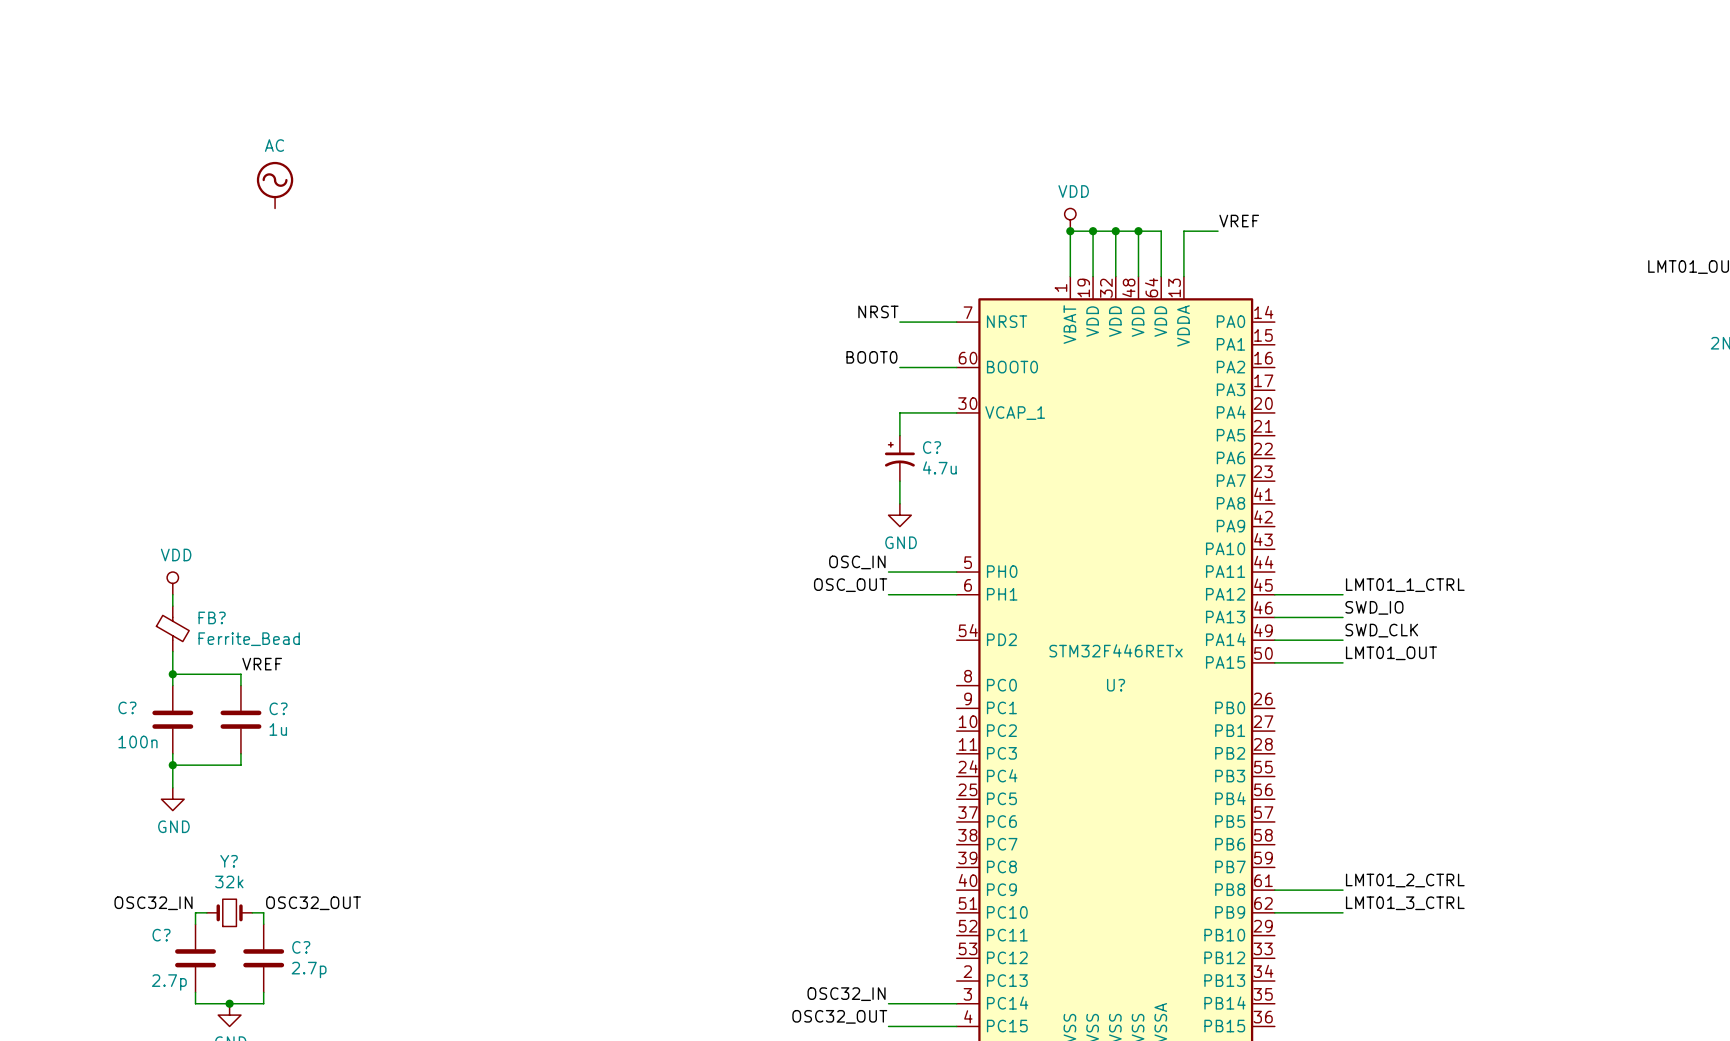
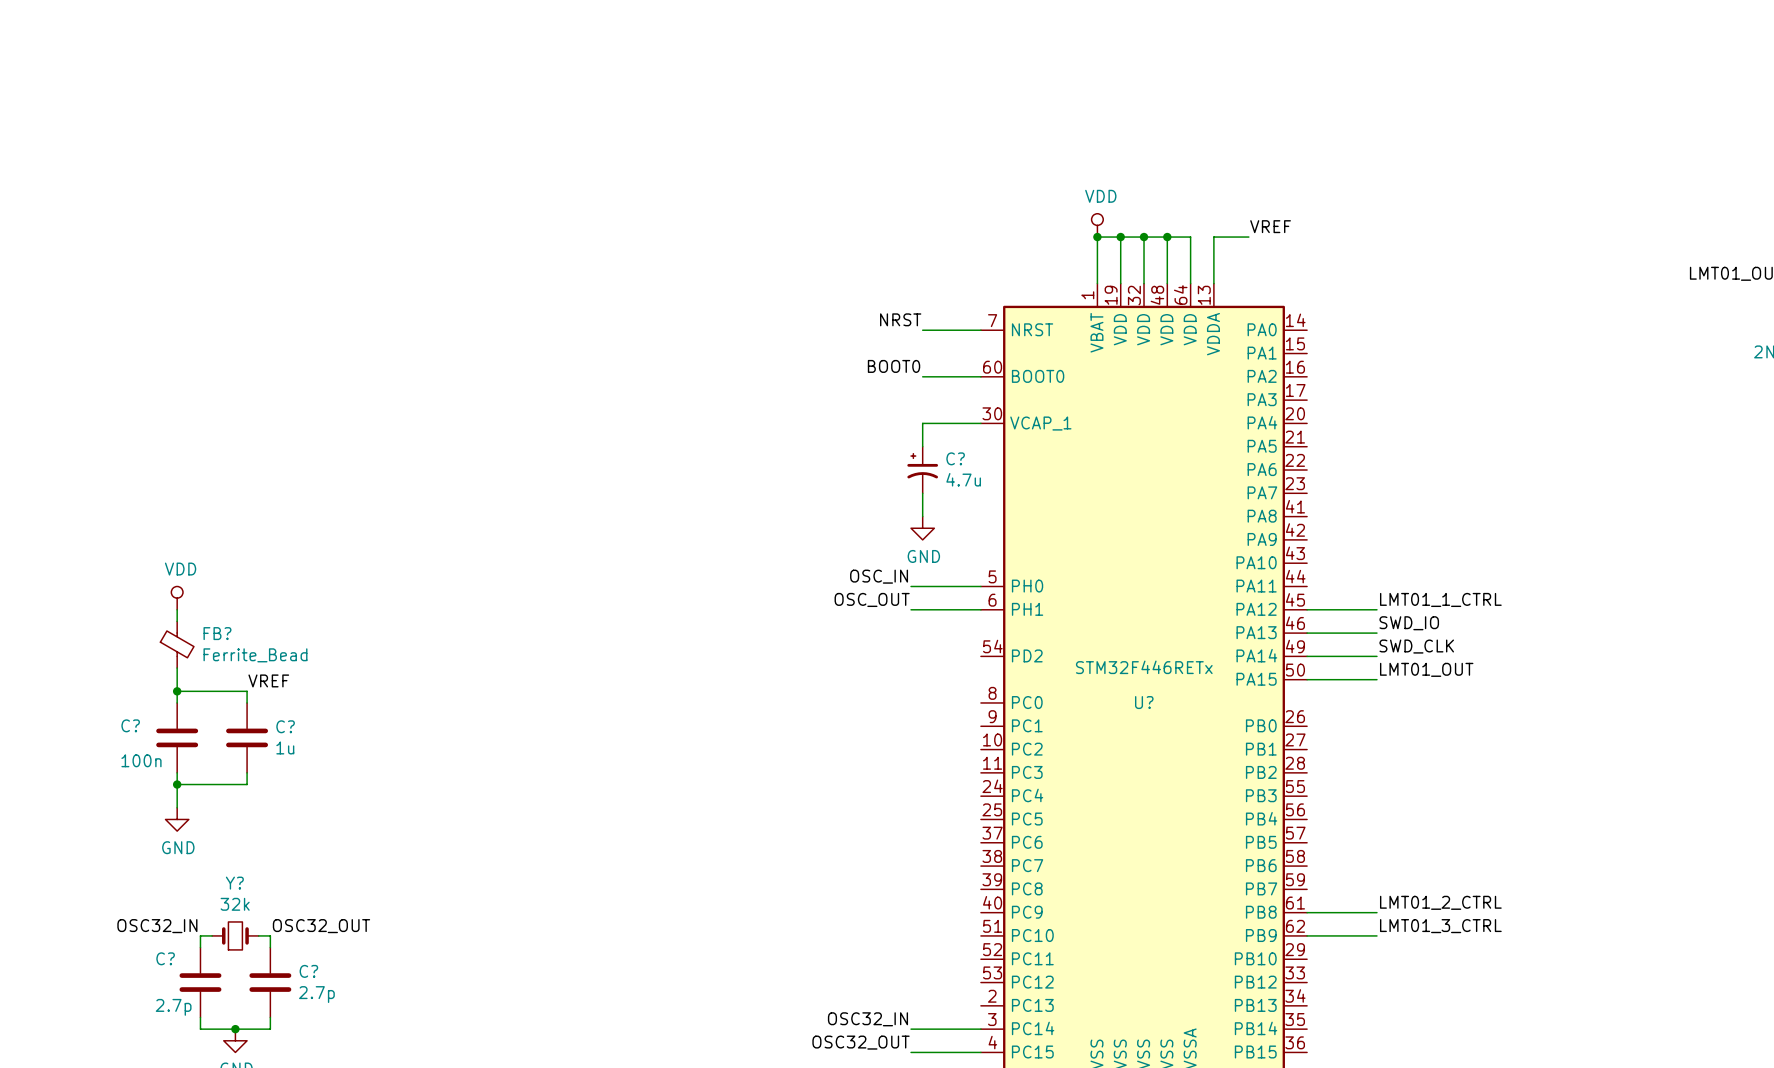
power symbol: AC (275, 185) -> none

